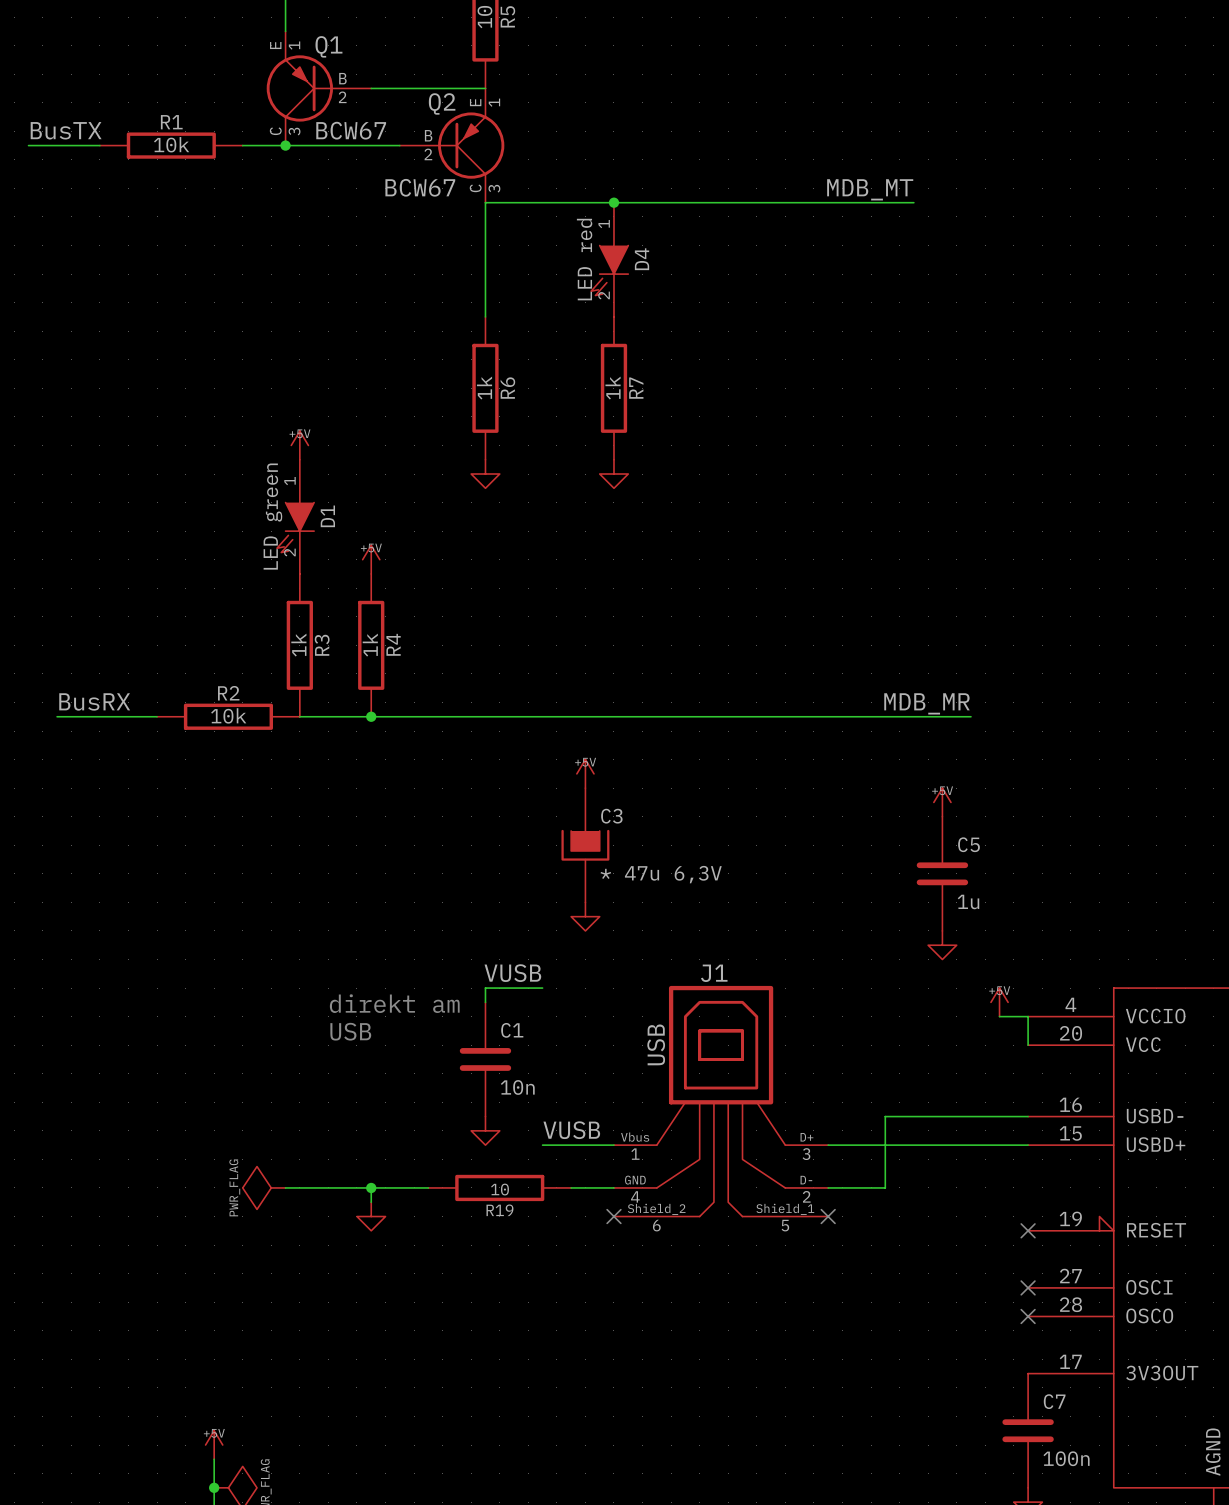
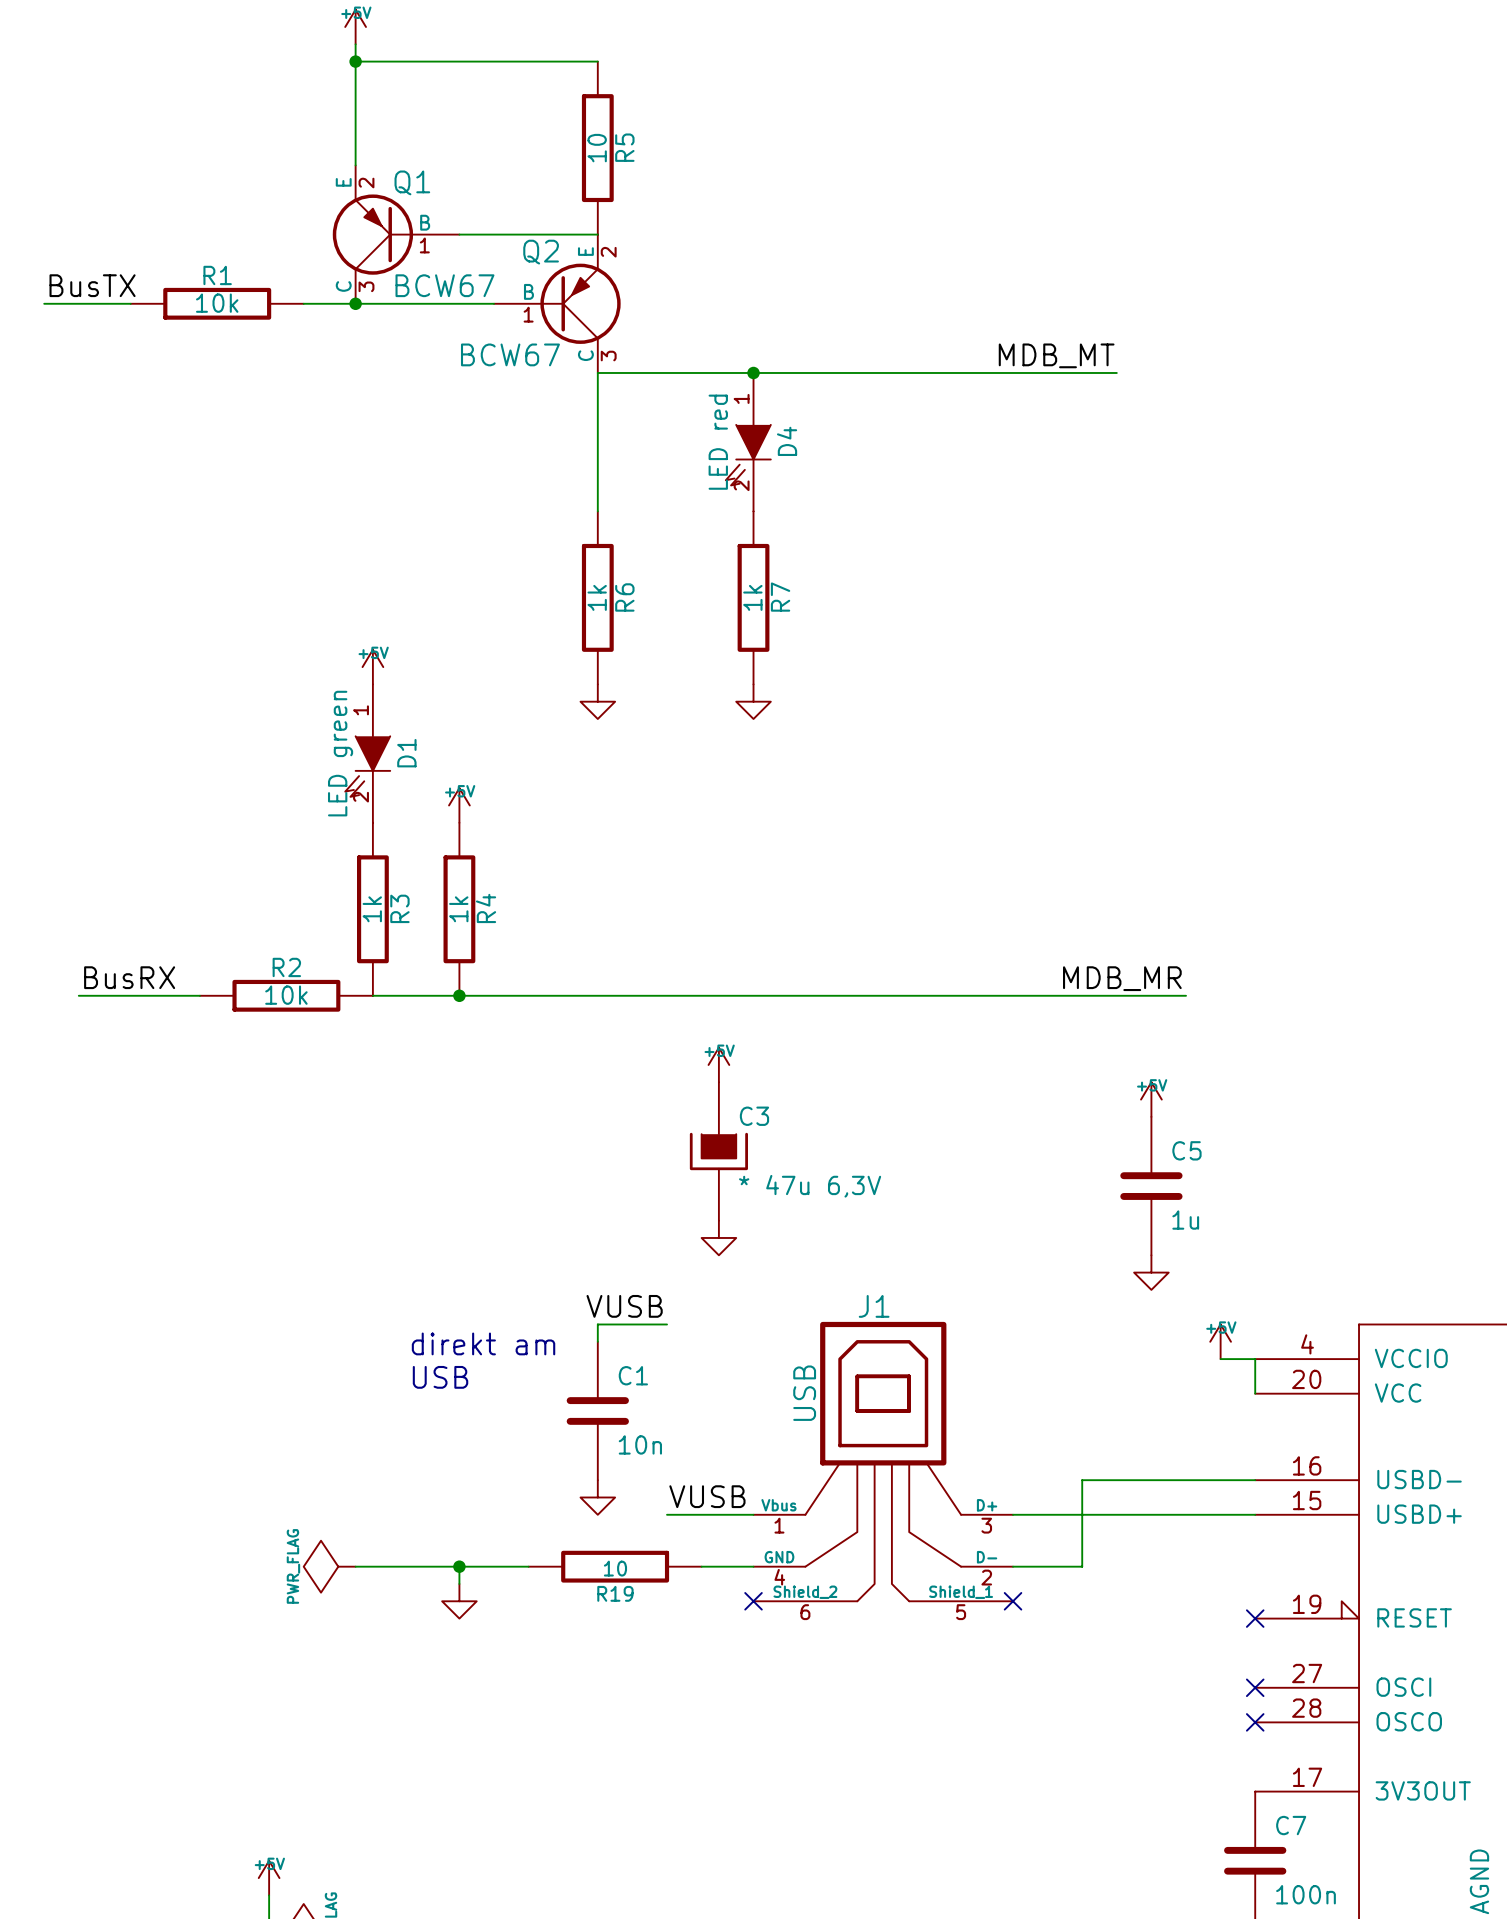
Q1 pin number: 1 (294, 45) -> 2 (366, 183)
Q1 pin number: 2 (342, 97) -> 1 (424, 245)
Q2 pin number: 1 (494, 102) -> 2 (608, 252)
Q2 pin number: 2 (428, 154) -> 1 (528, 314)

